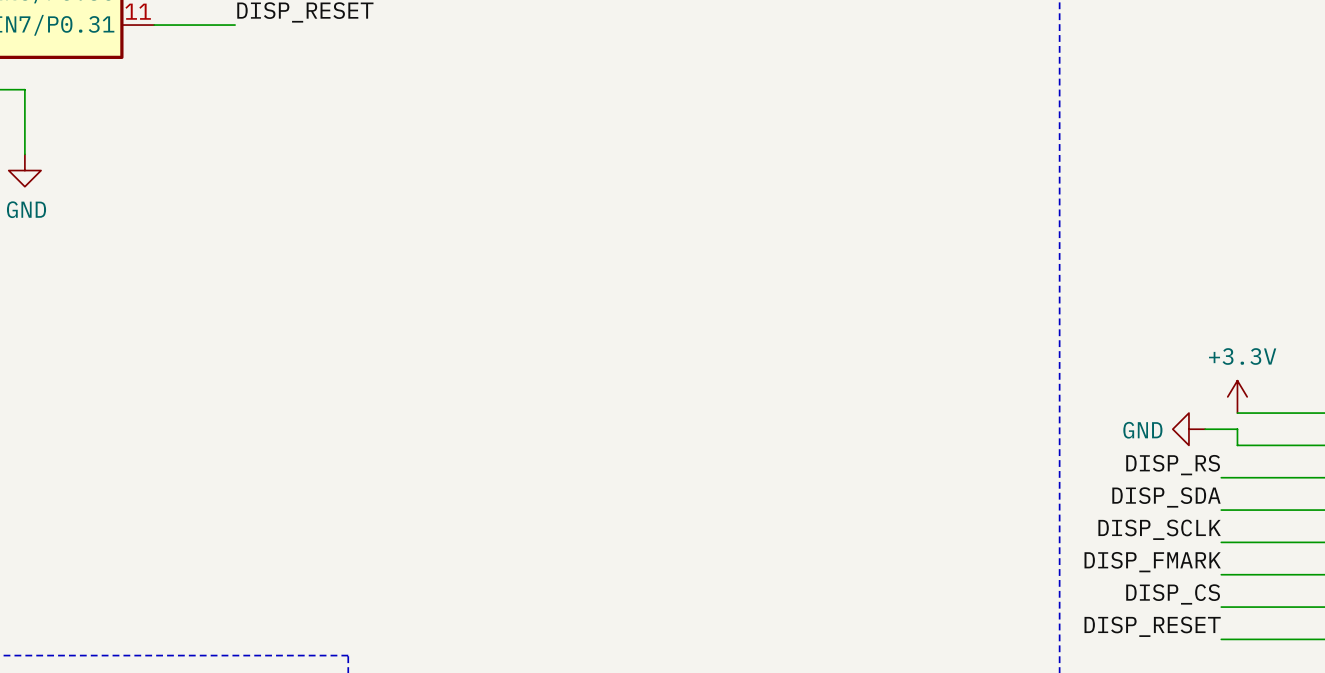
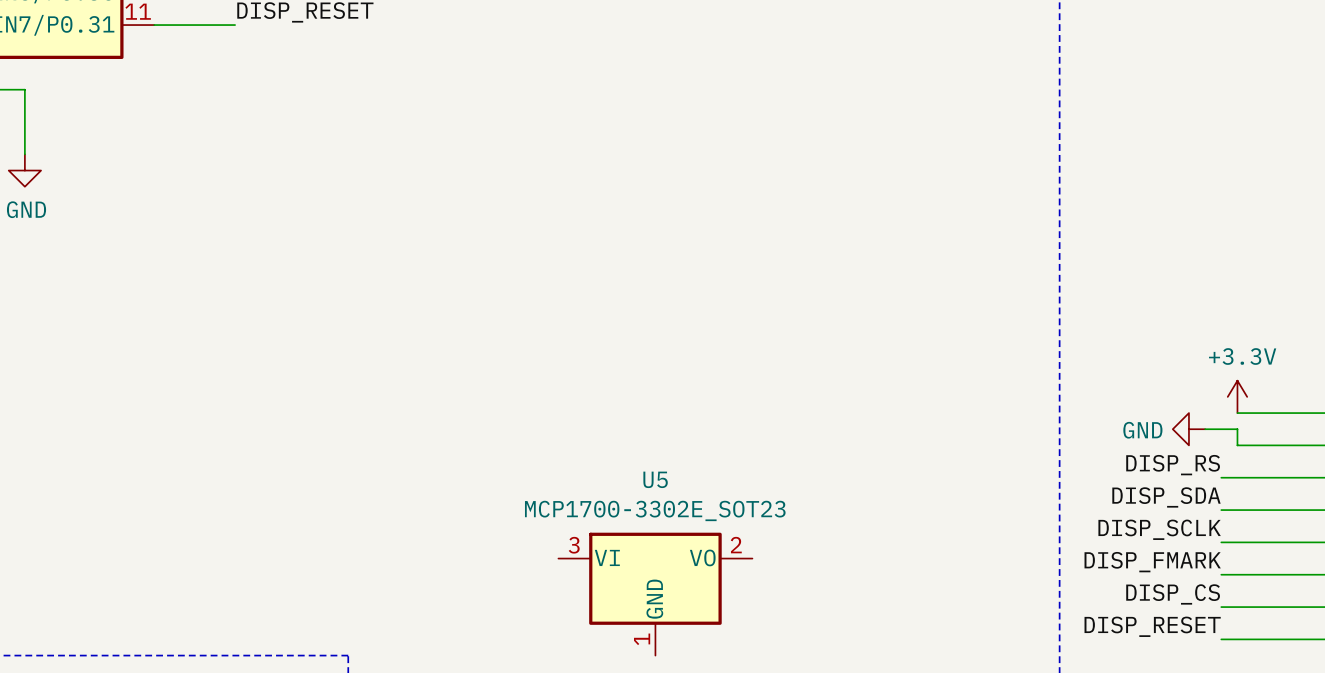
U5: none -> MCP1700-3302E_SOT23 (655, 594)

